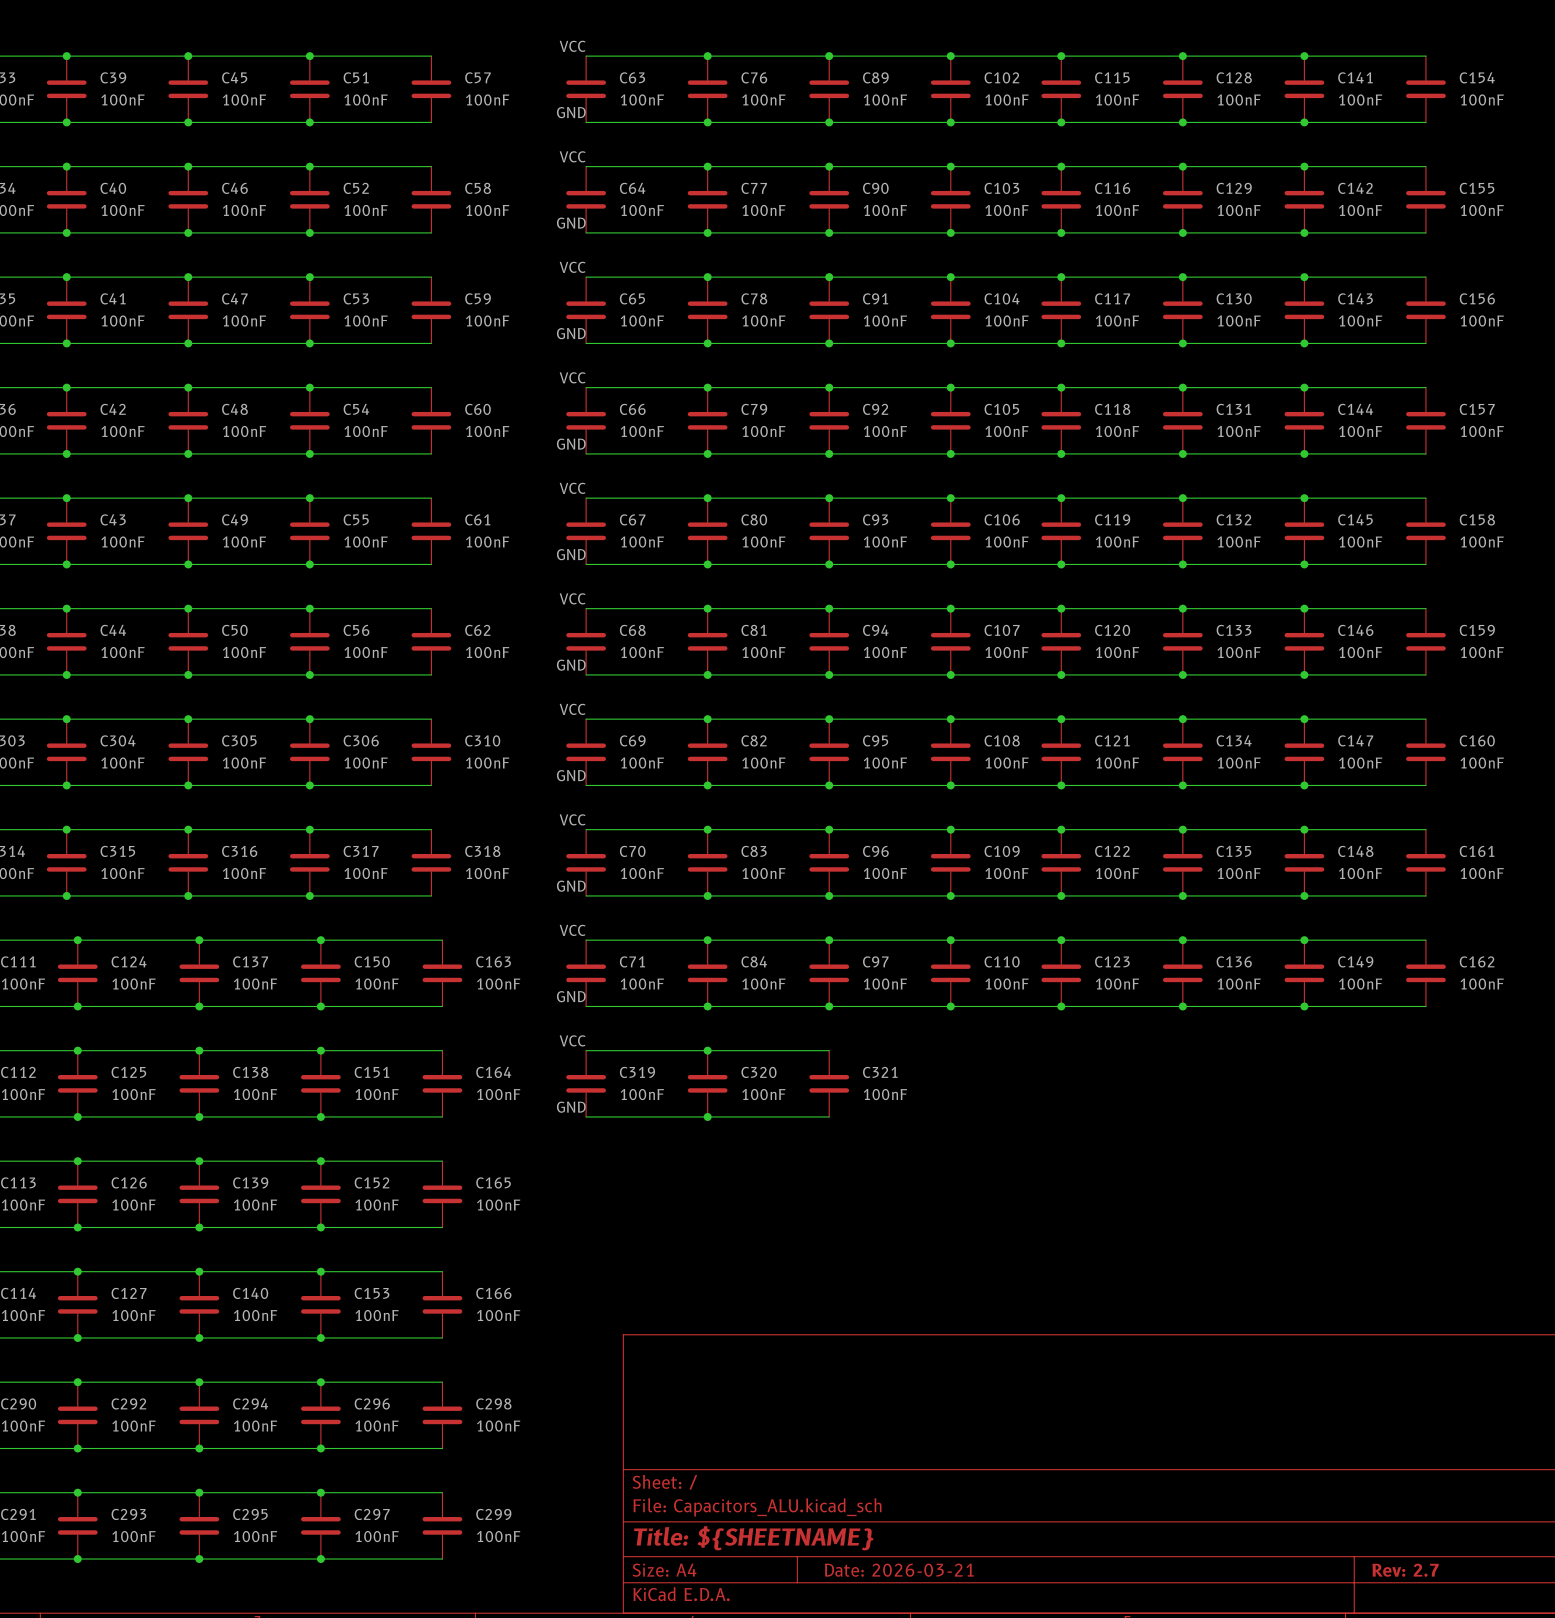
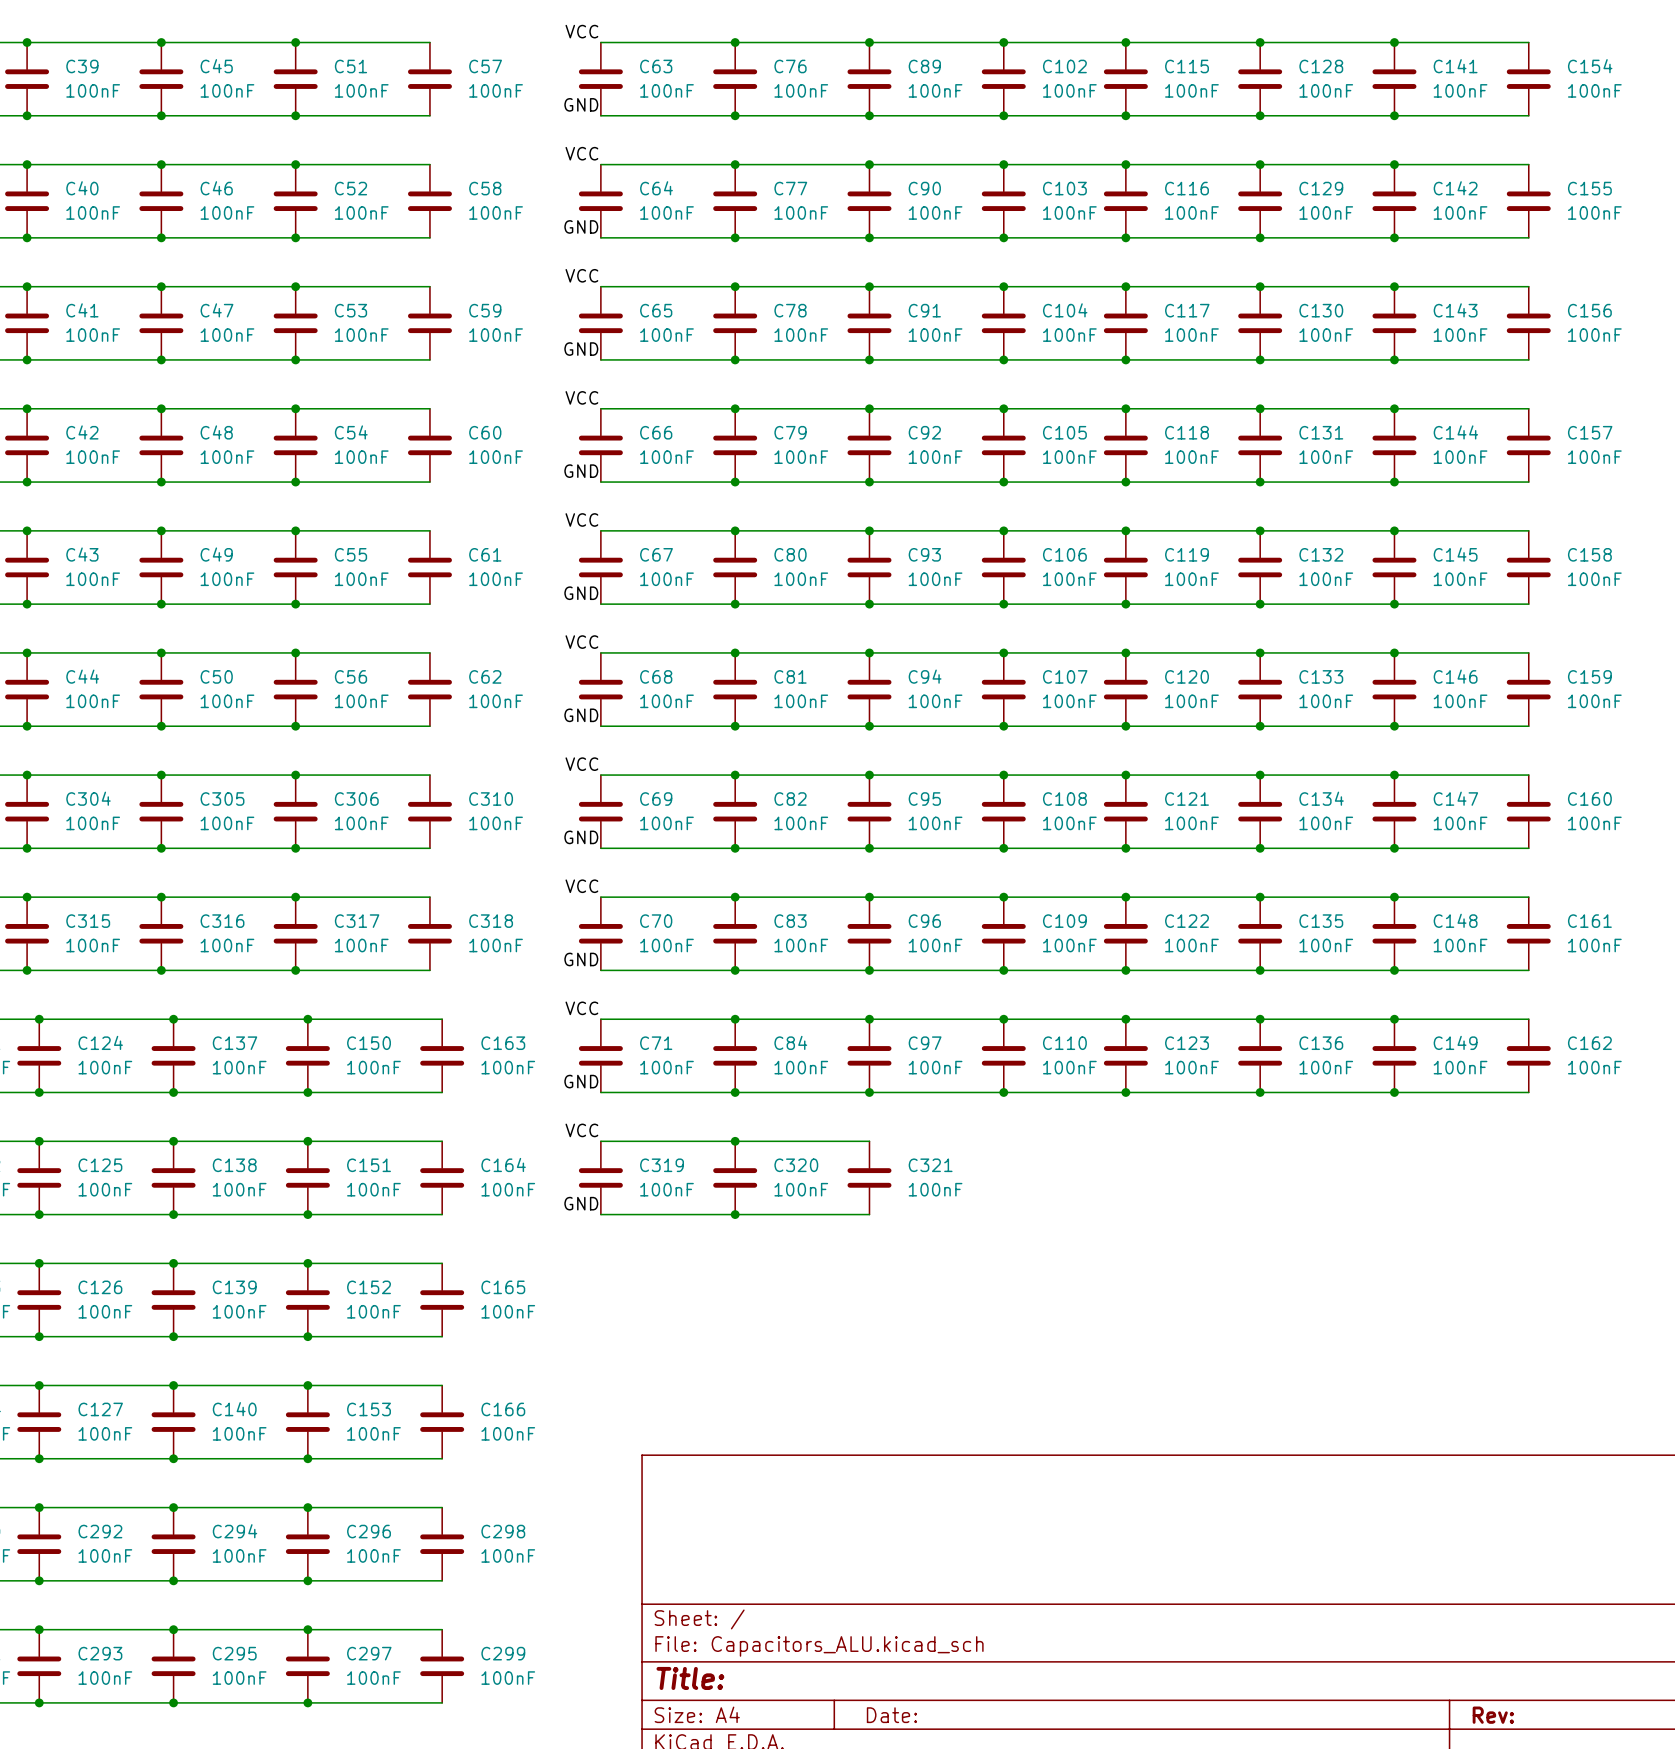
title block: Title: ${SHEETNAME} (753, 1538) -> Title: (690, 1678)
title block: Date: 2026-03-21 (899, 1570) -> Date: (891, 1715)
title block: Rev: 2.7 (1405, 1570) -> Rev: (1493, 1715)

